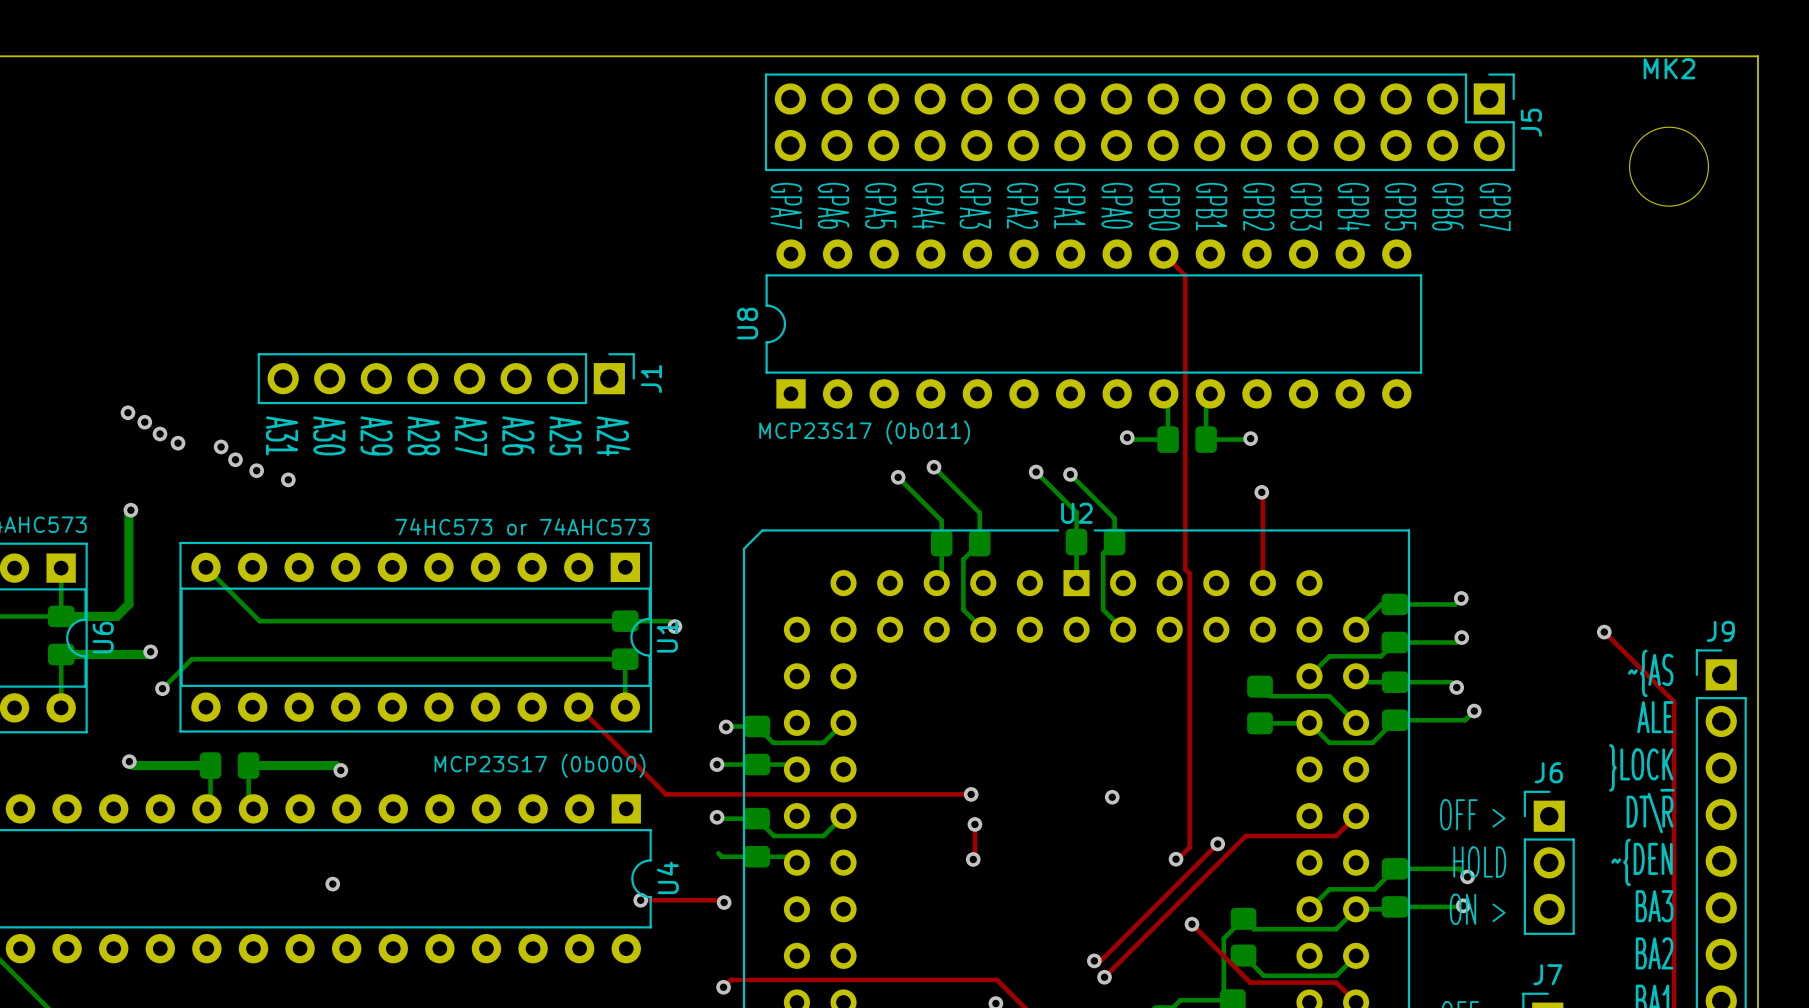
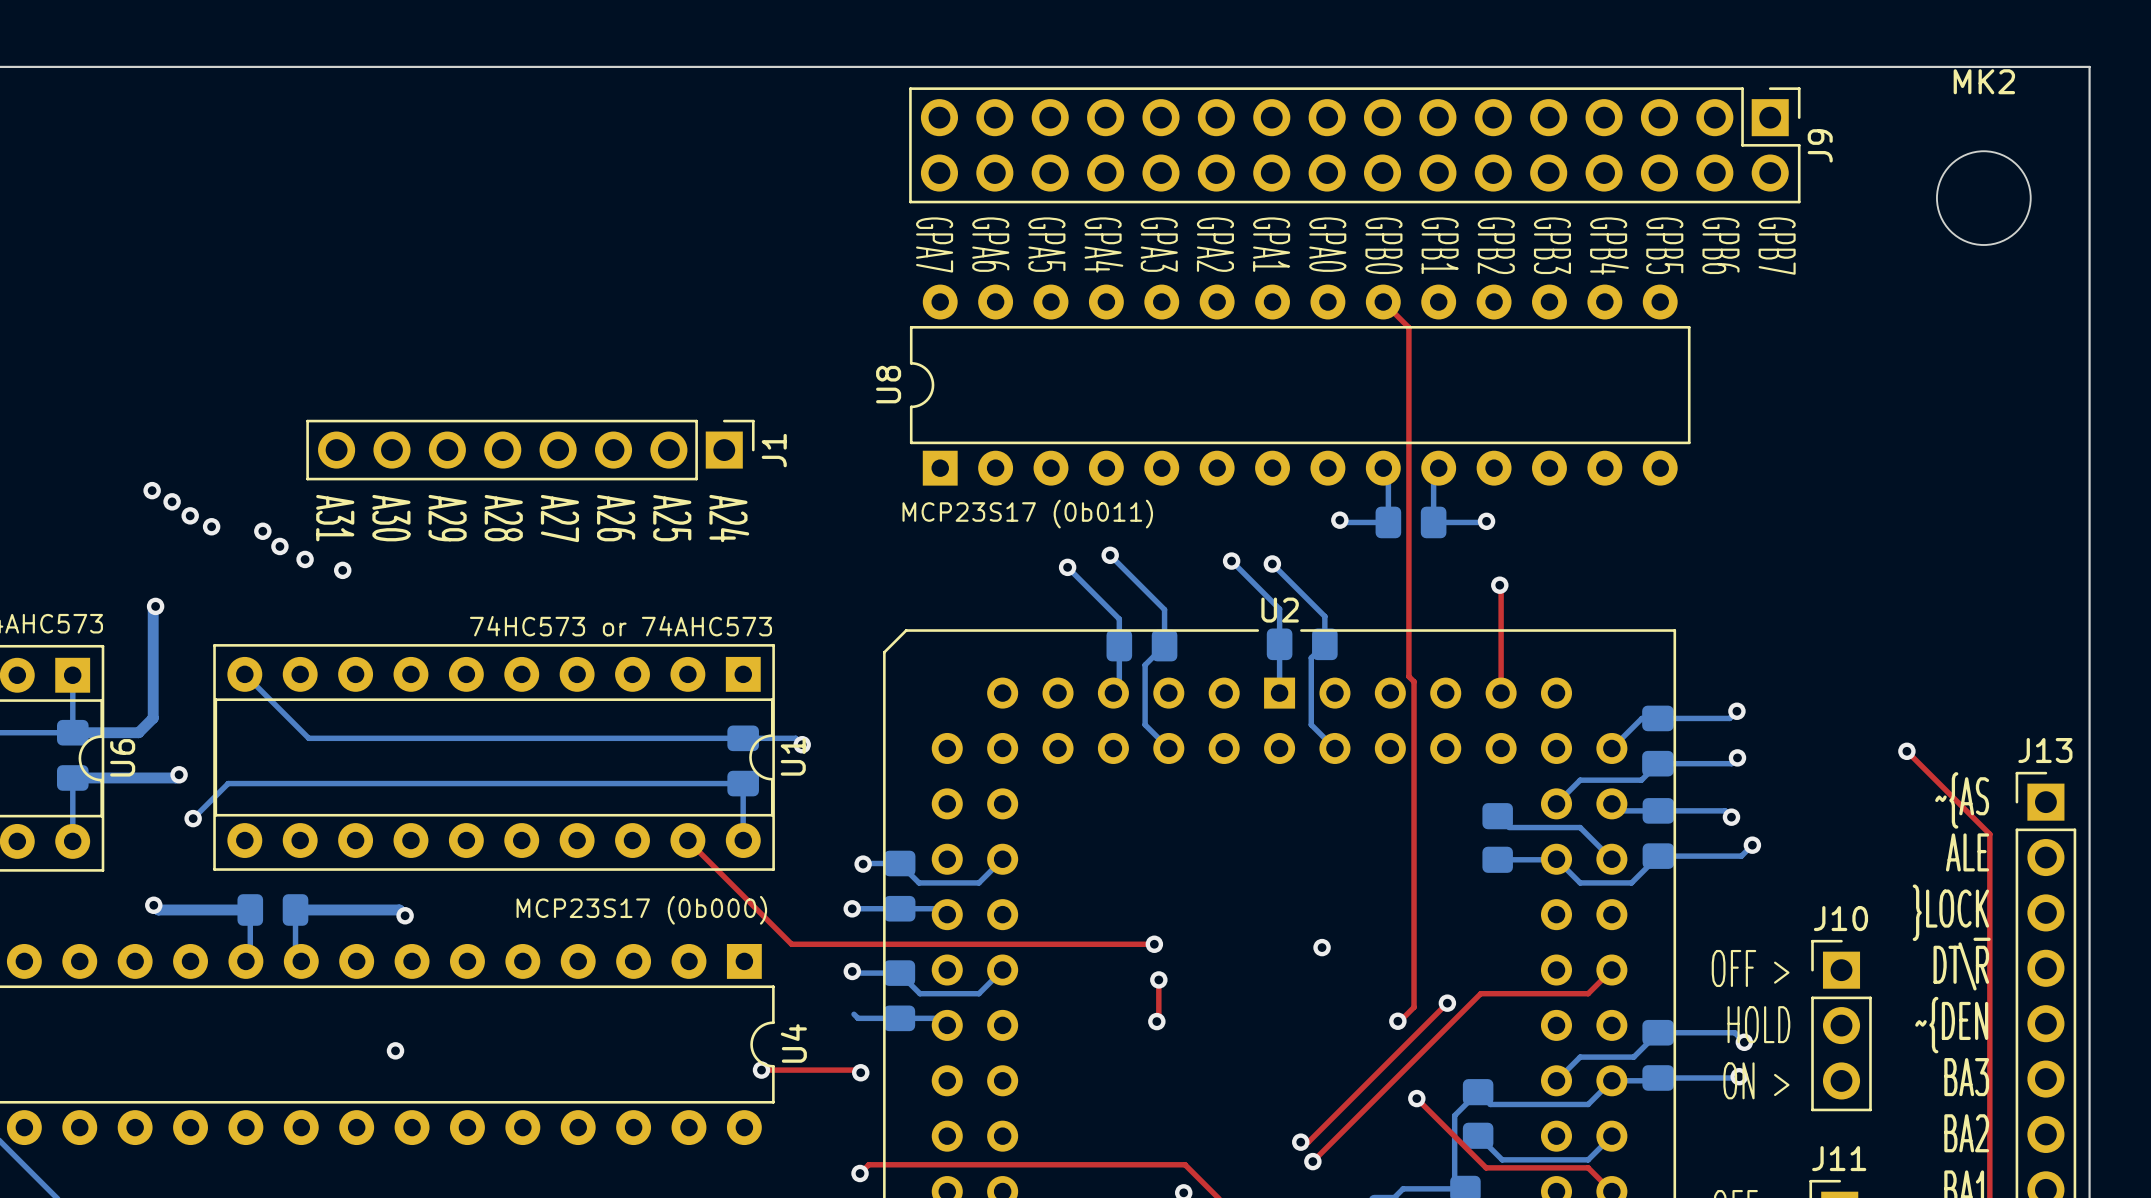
J5 name: J5 (1531, 122) -> J9 (1820, 145)
J9 name: J9 (1720, 631) -> J13 (2045, 750)
J6 name: J6 (1548, 772) -> J10 (1840, 918)
J7 name: J7 (1547, 974) -> J11 (1839, 1158)

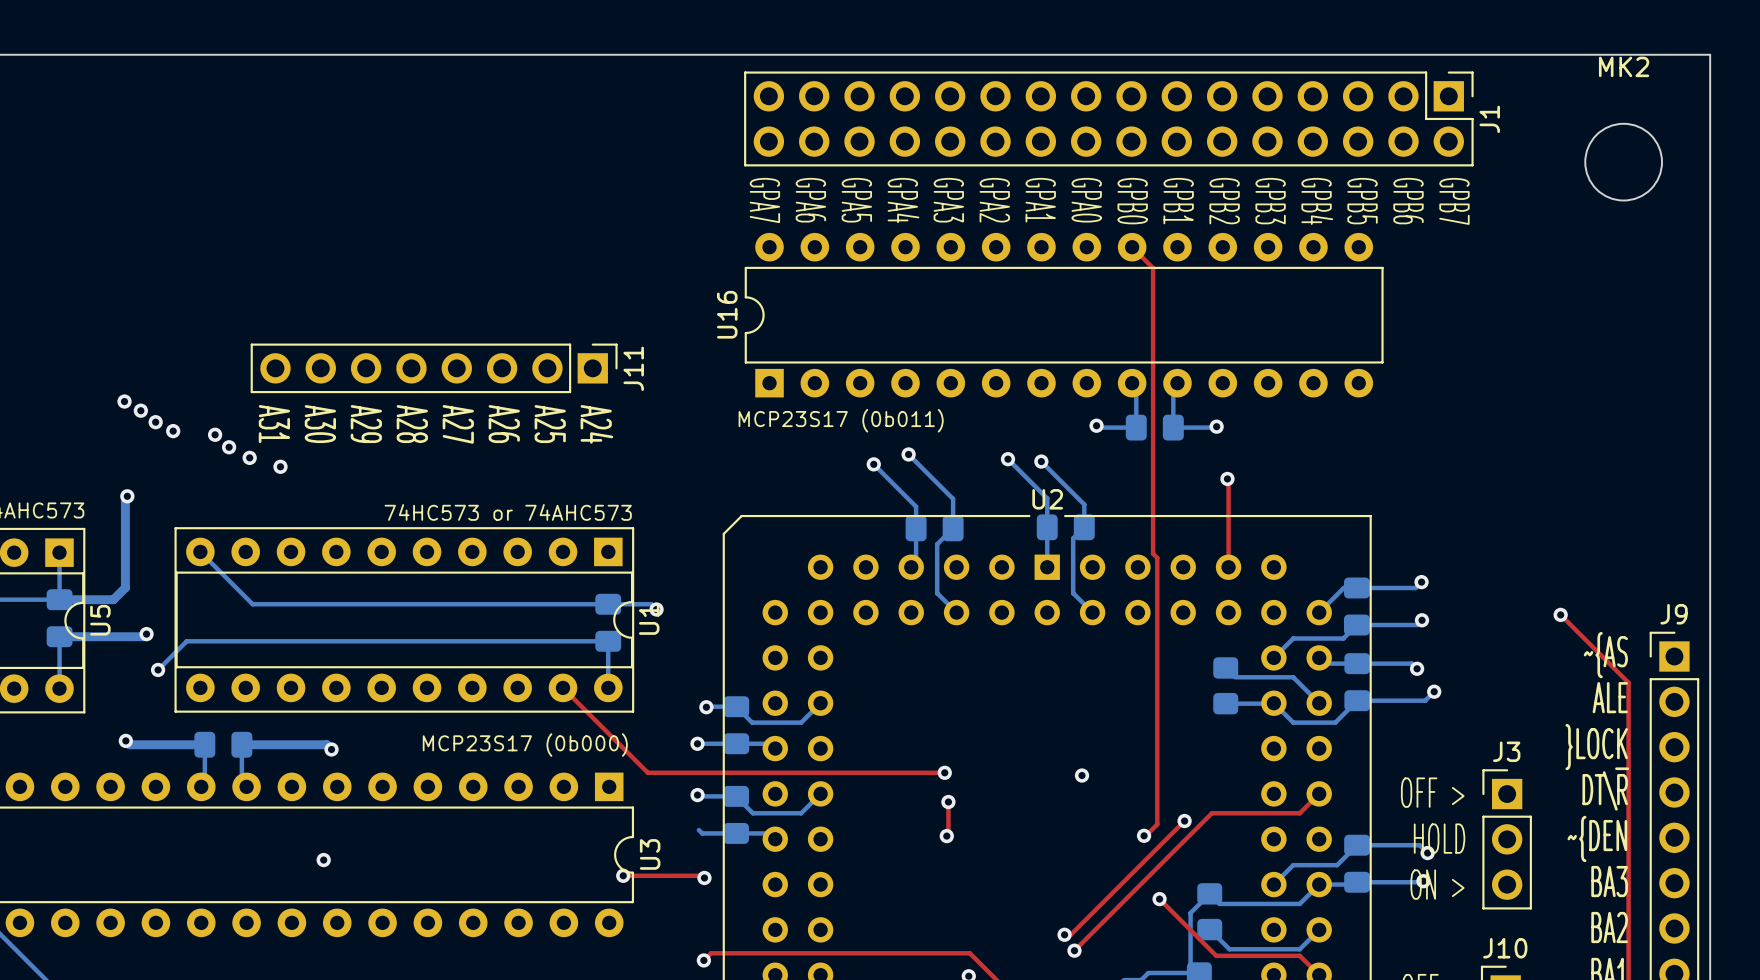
J9 name: J9 (1820, 145) -> J1 (1489, 119)
U8 name: U8 (888, 384) -> U16 (727, 314)
J1 name: J1 (774, 450) -> J11 (633, 368)
J13 name: J13 (2045, 750) -> J9 (1674, 614)
U6 name: U6 (122, 757) -> U5 (100, 620)
J10 name: J10 (1840, 918) -> J3 (1506, 751)
U4 name: U4 (793, 1043) -> U3 (650, 854)
J11 name: J11 (1839, 1158) -> J10 (1505, 948)

